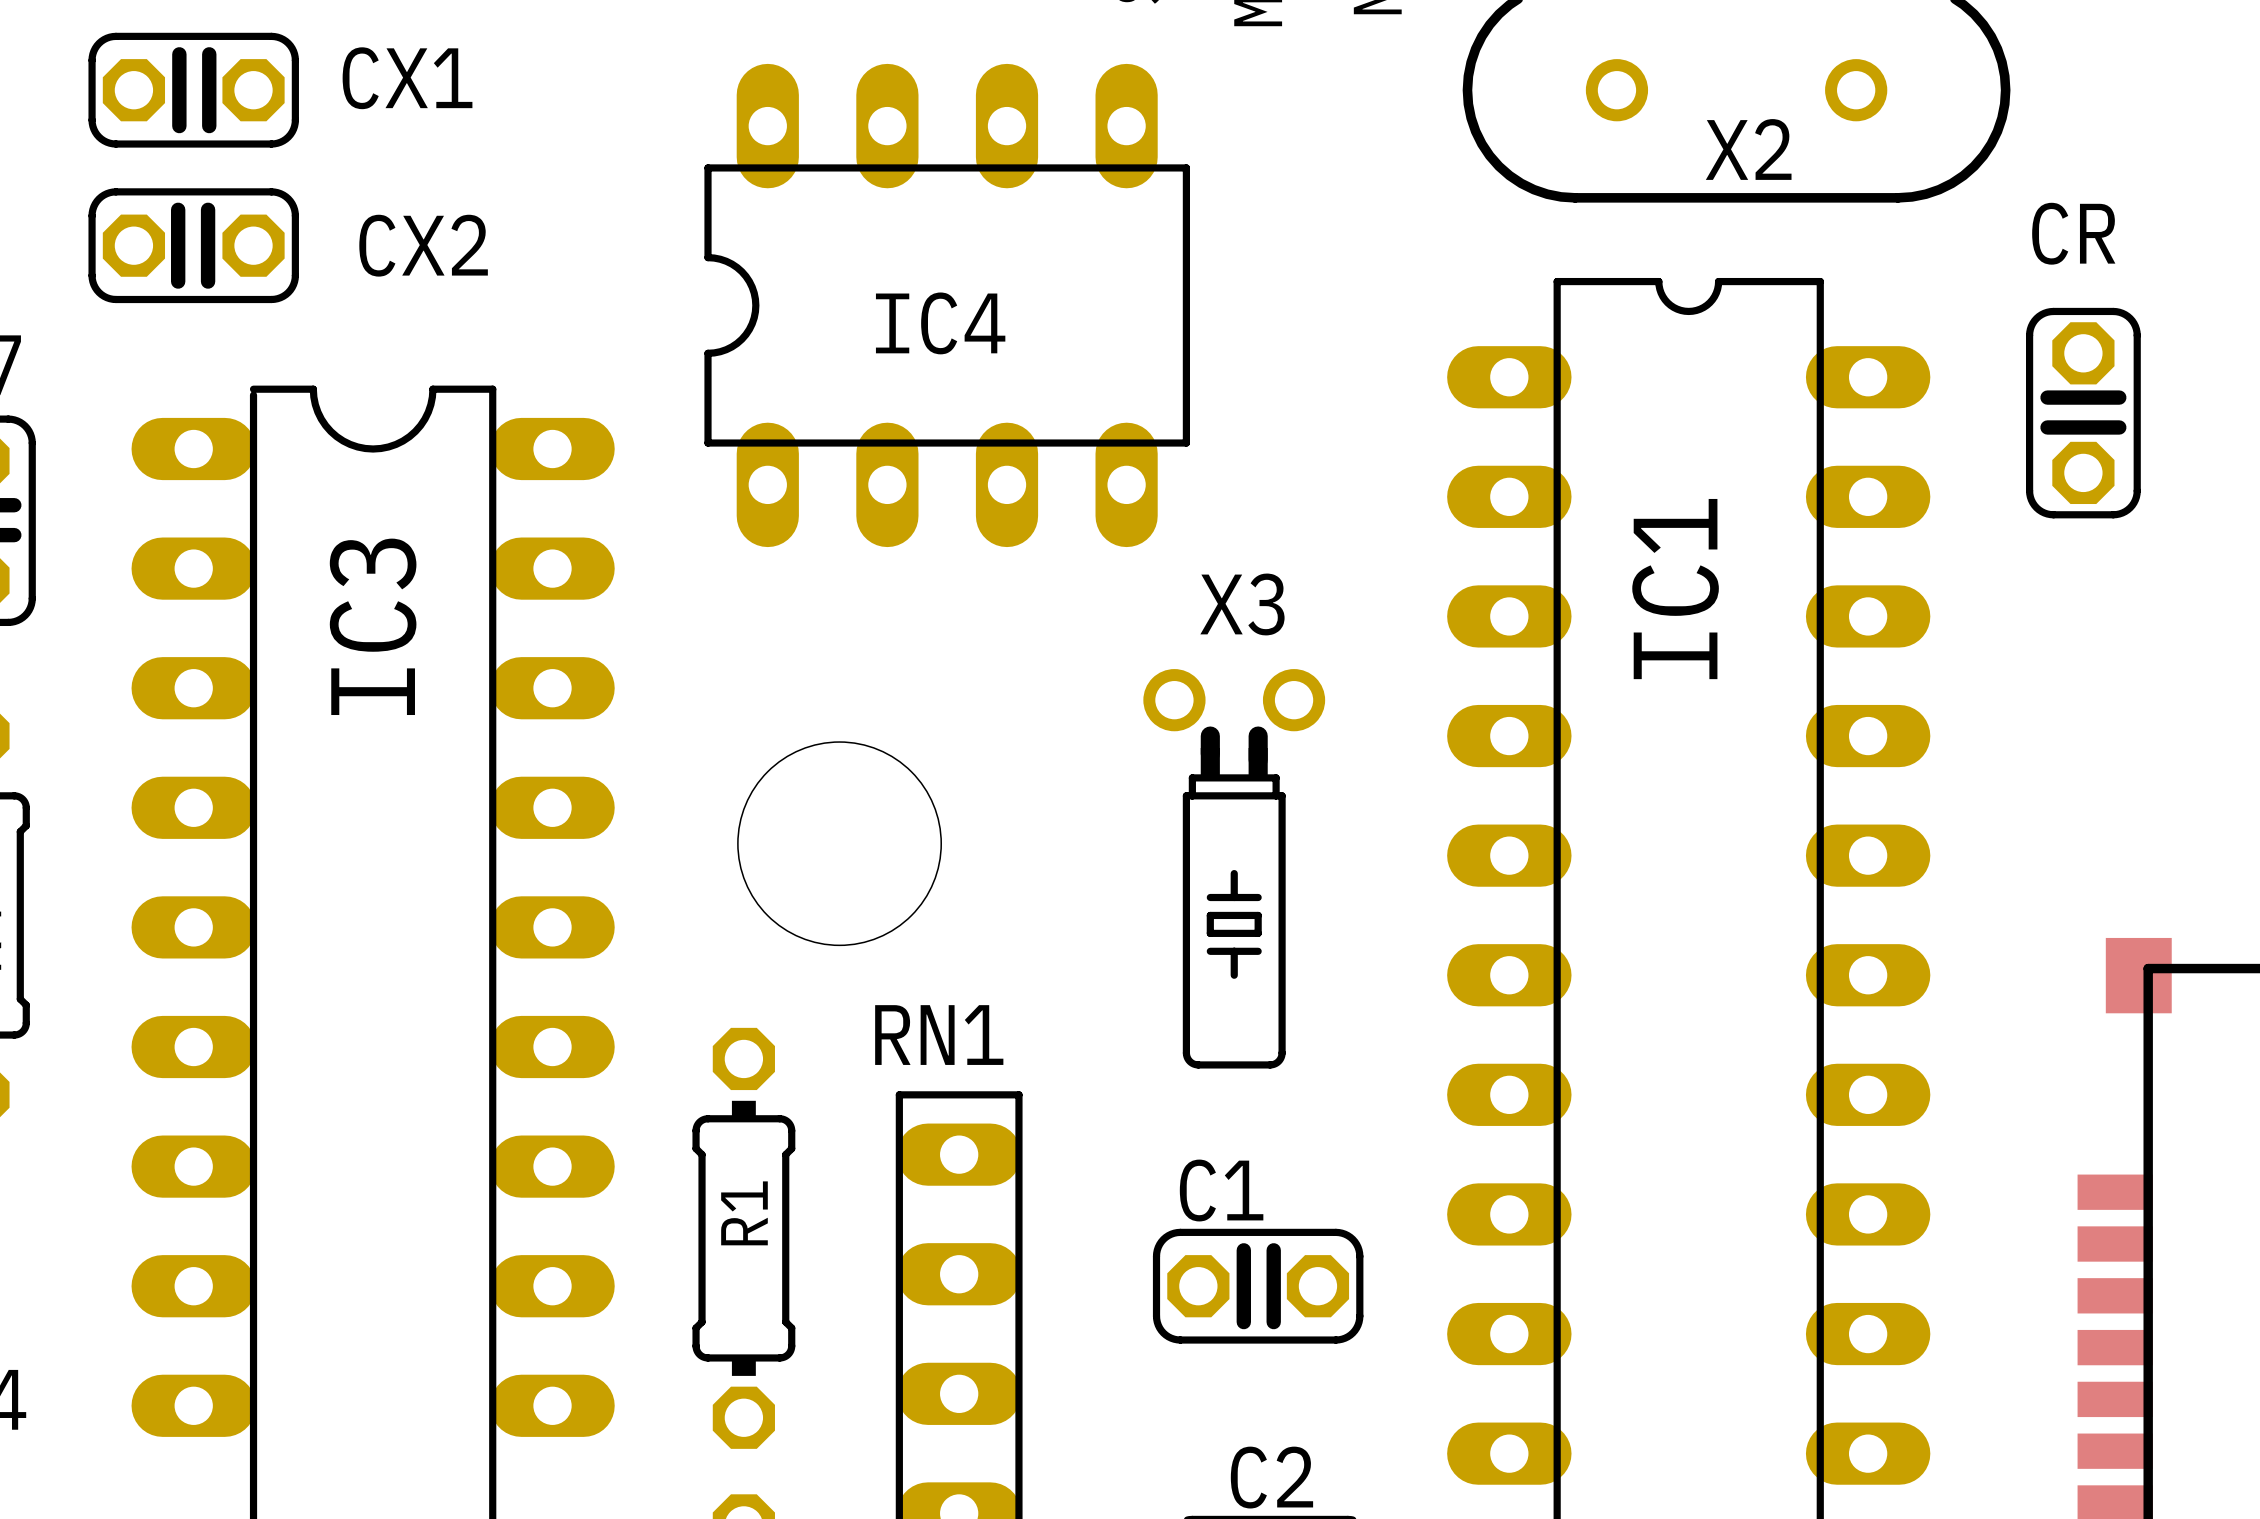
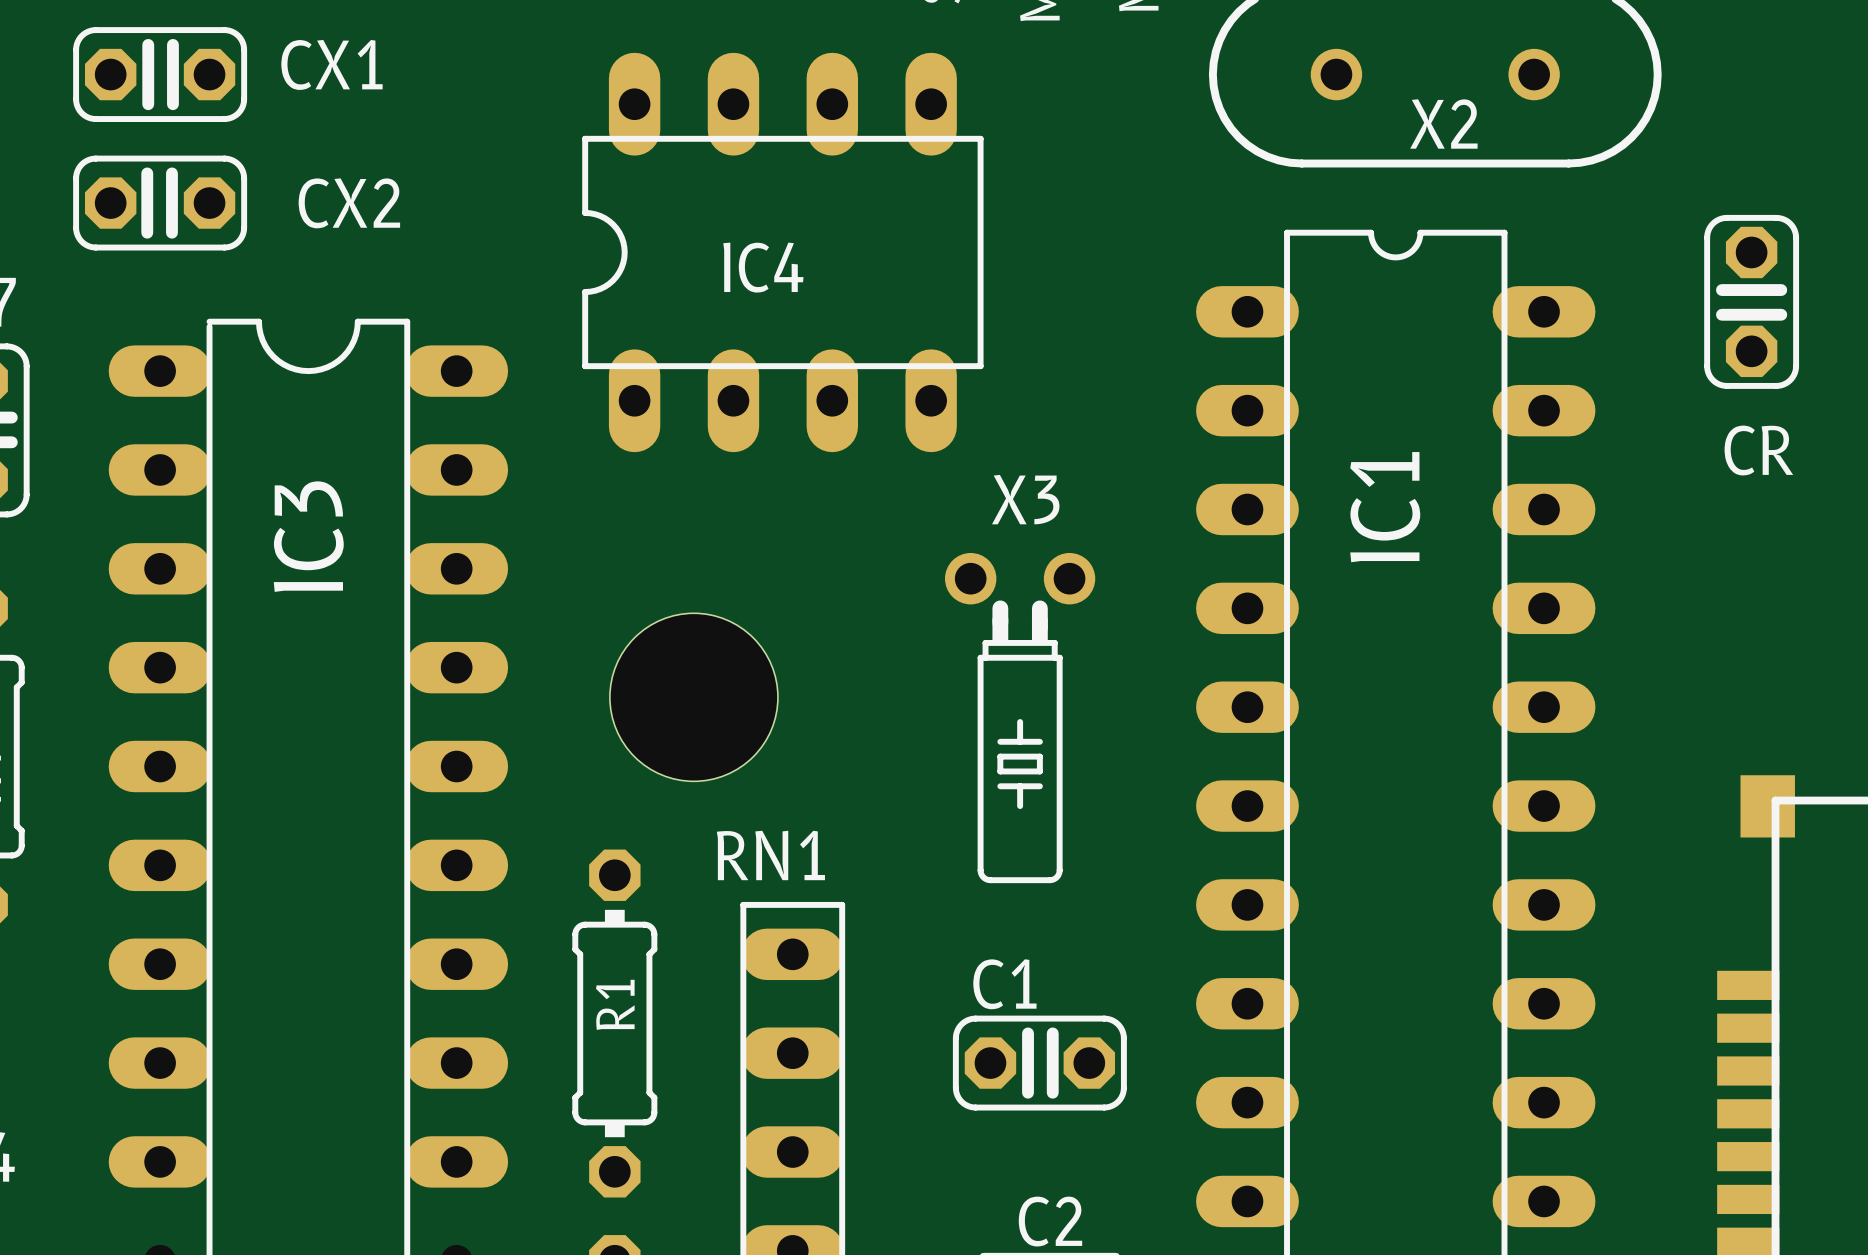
CR rotation: 0° (2083, 413) -> 180° (1751, 301)

